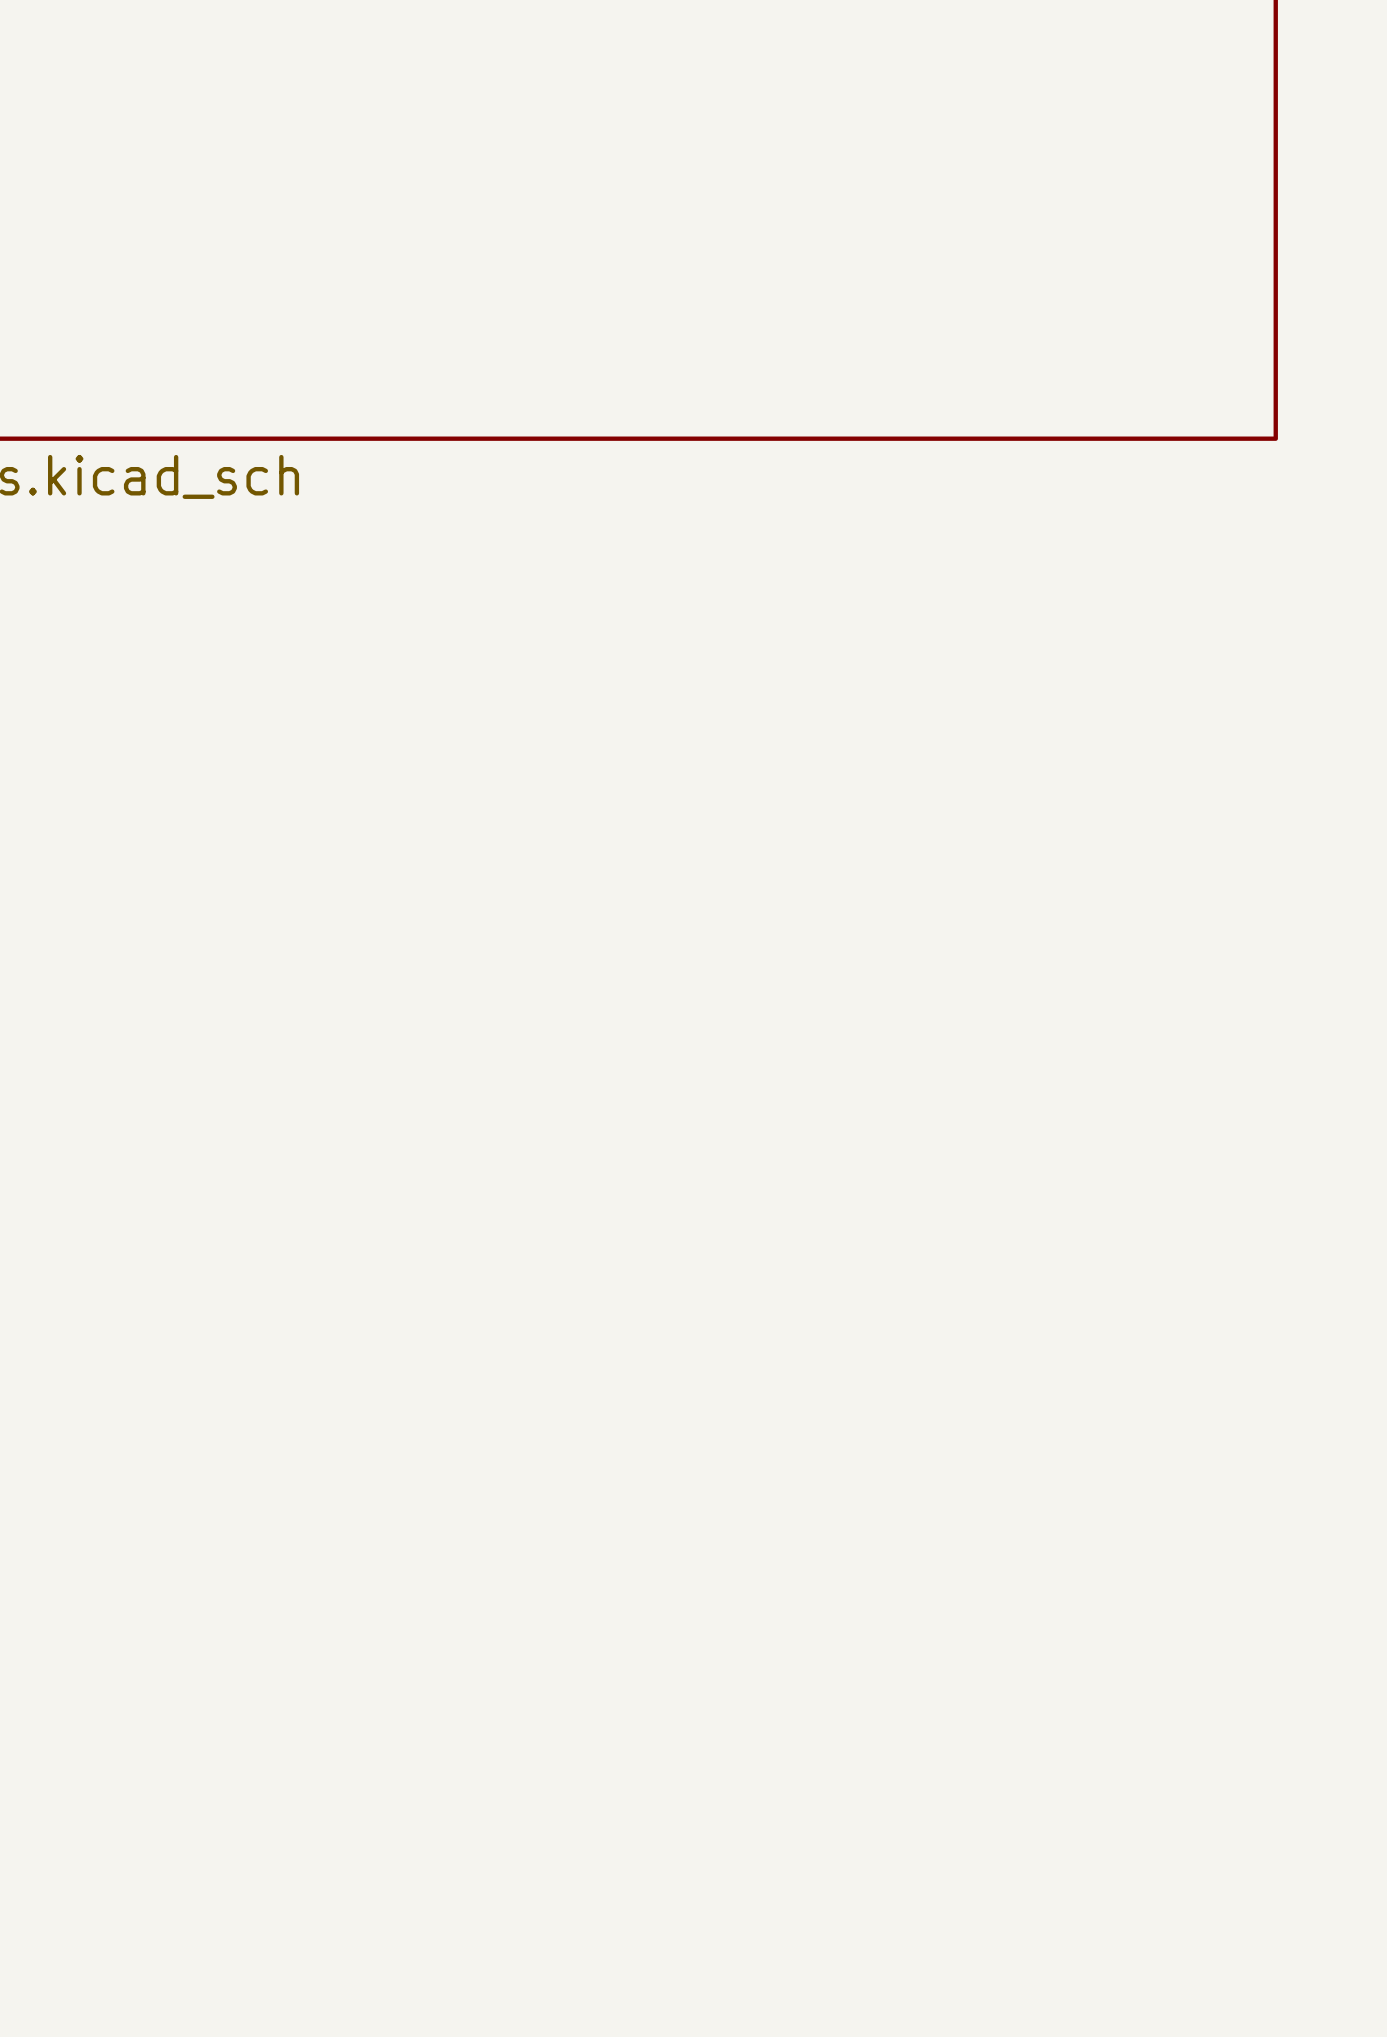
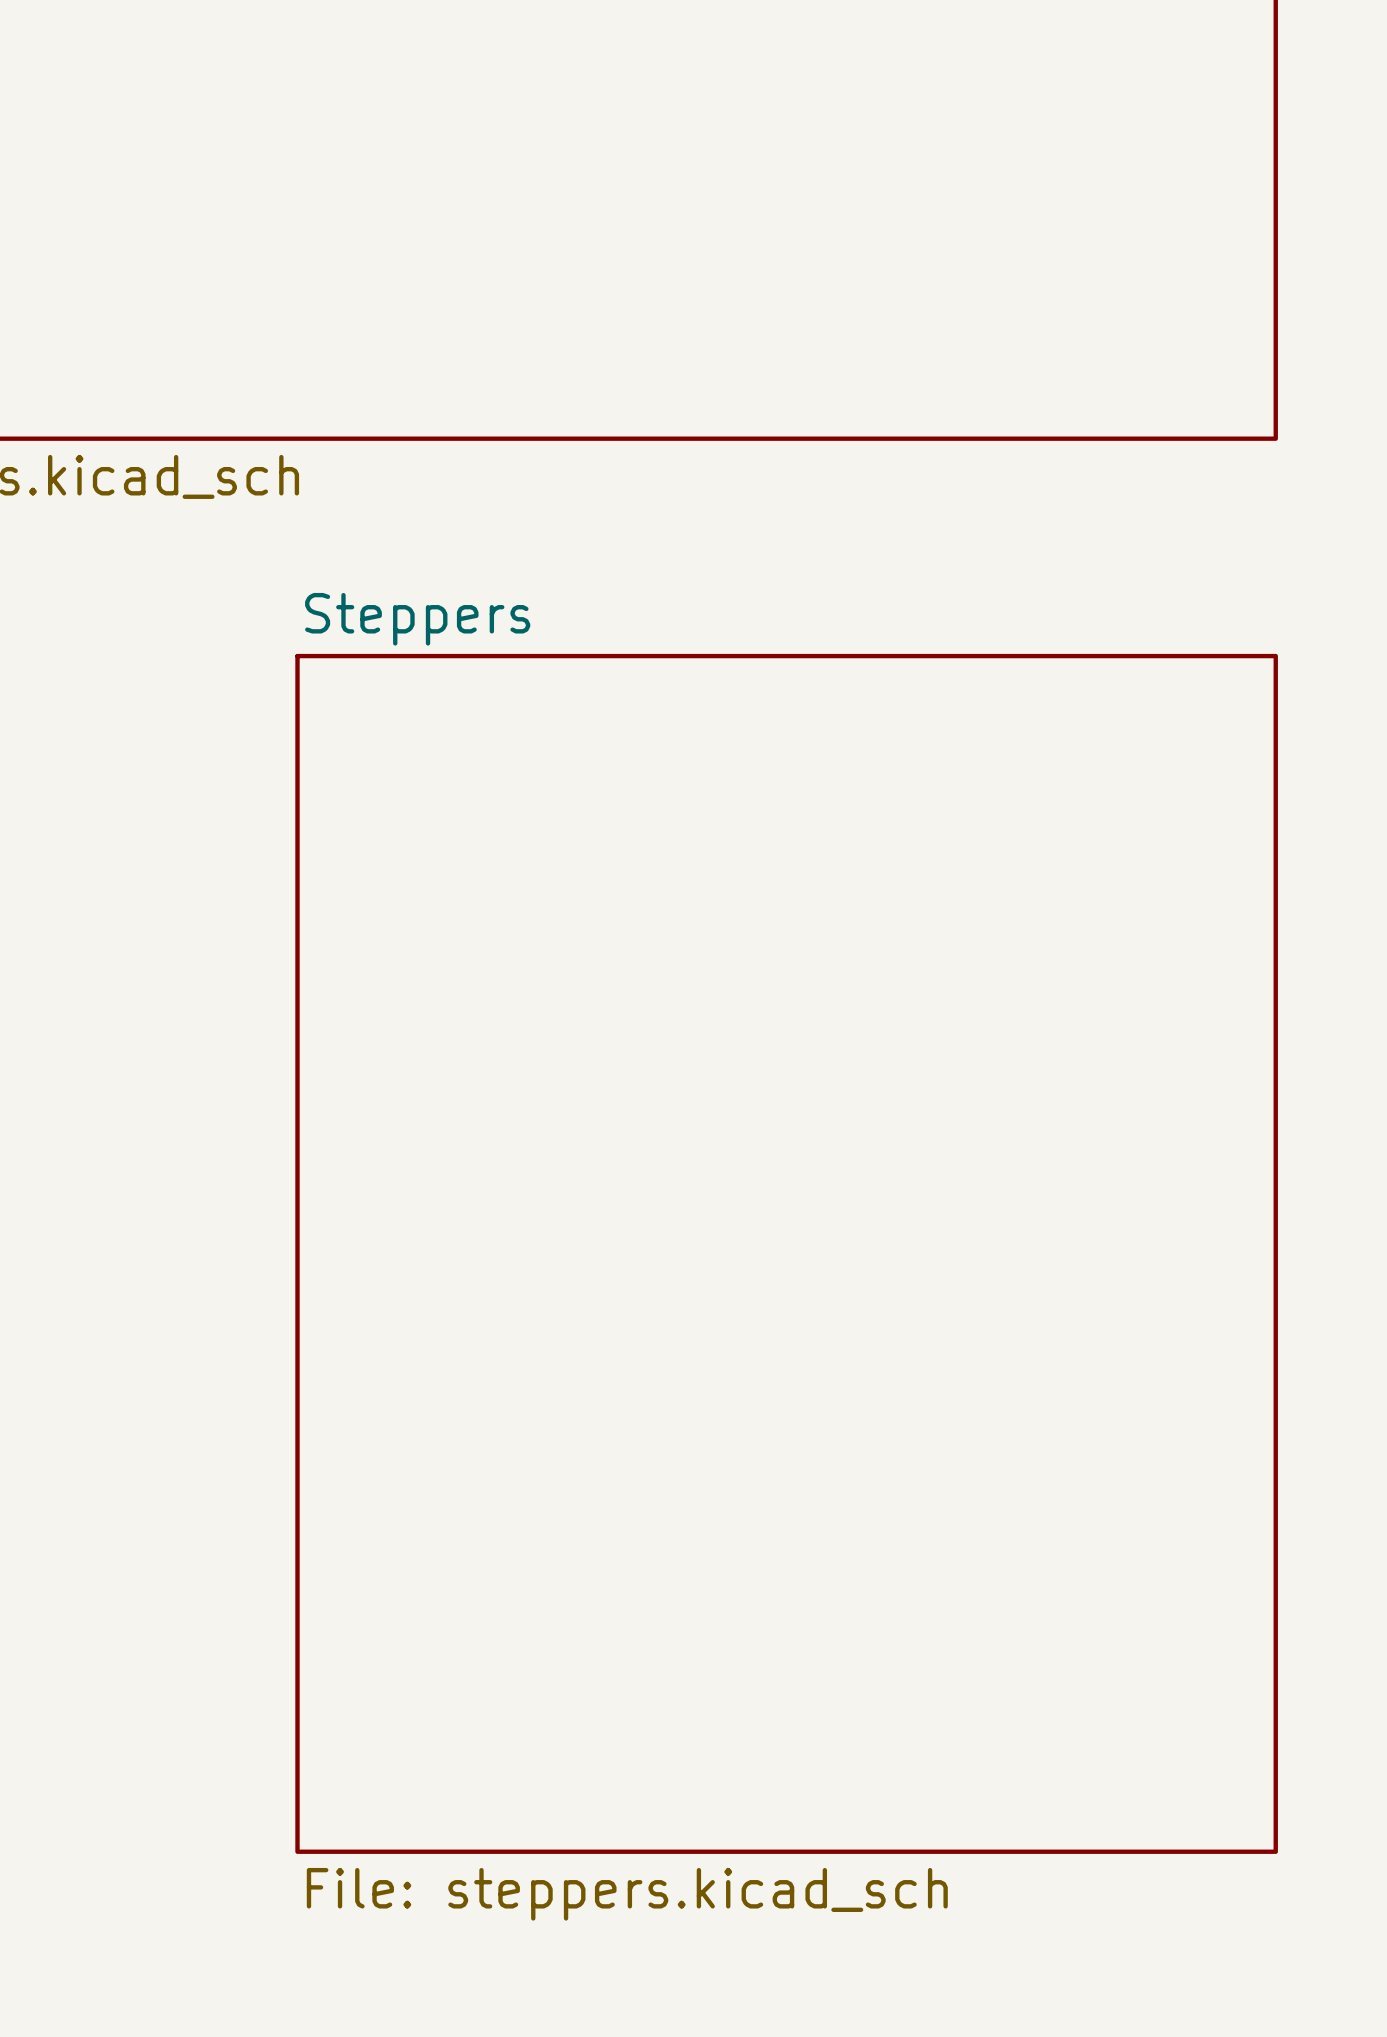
sheet Steppers: none -> File: steppers.kicad_sch (786, 1253)

